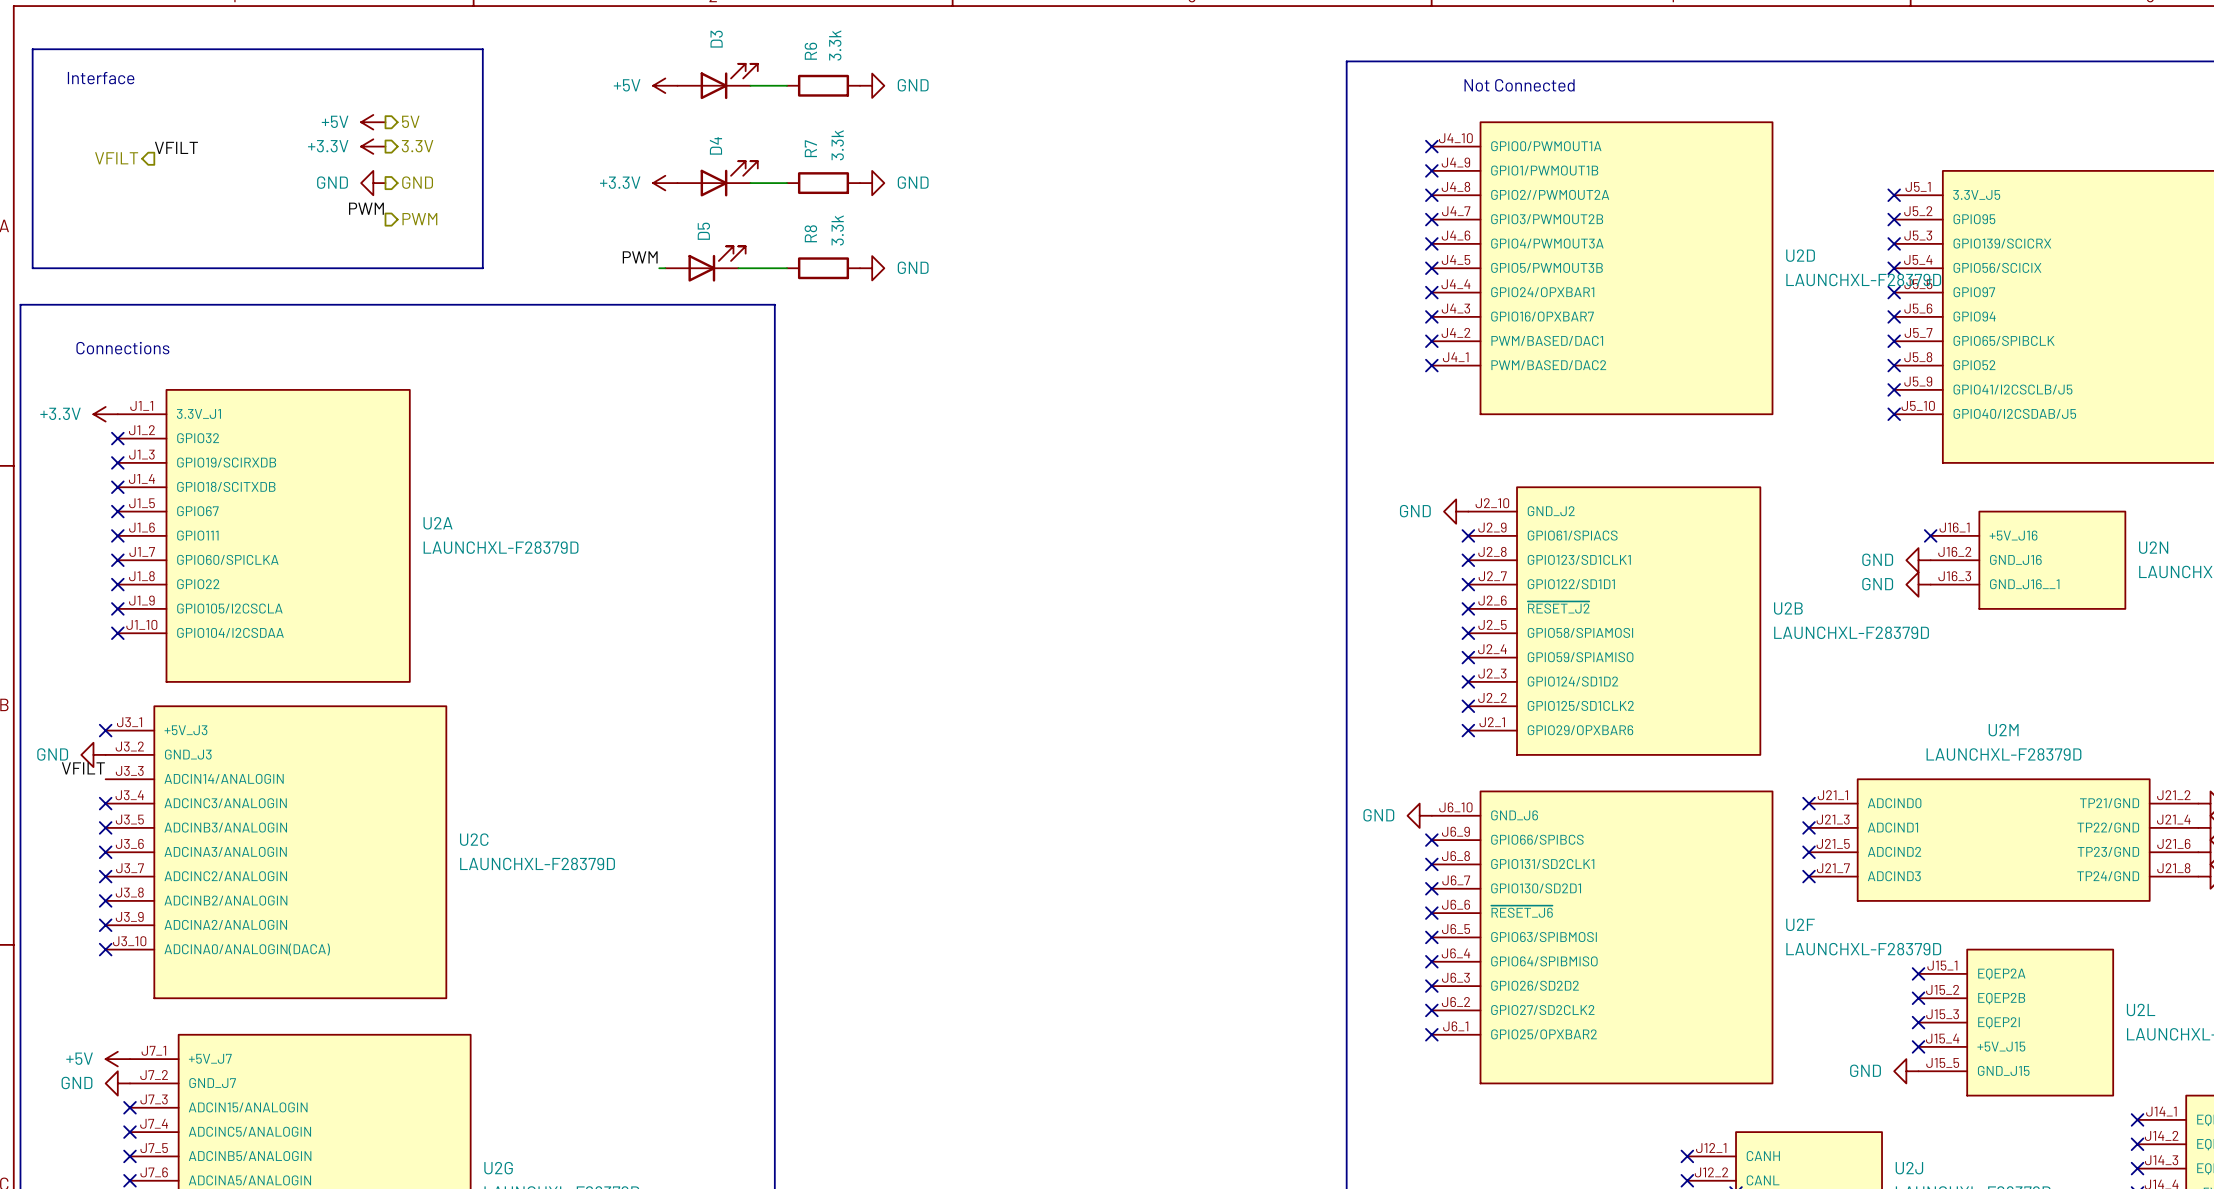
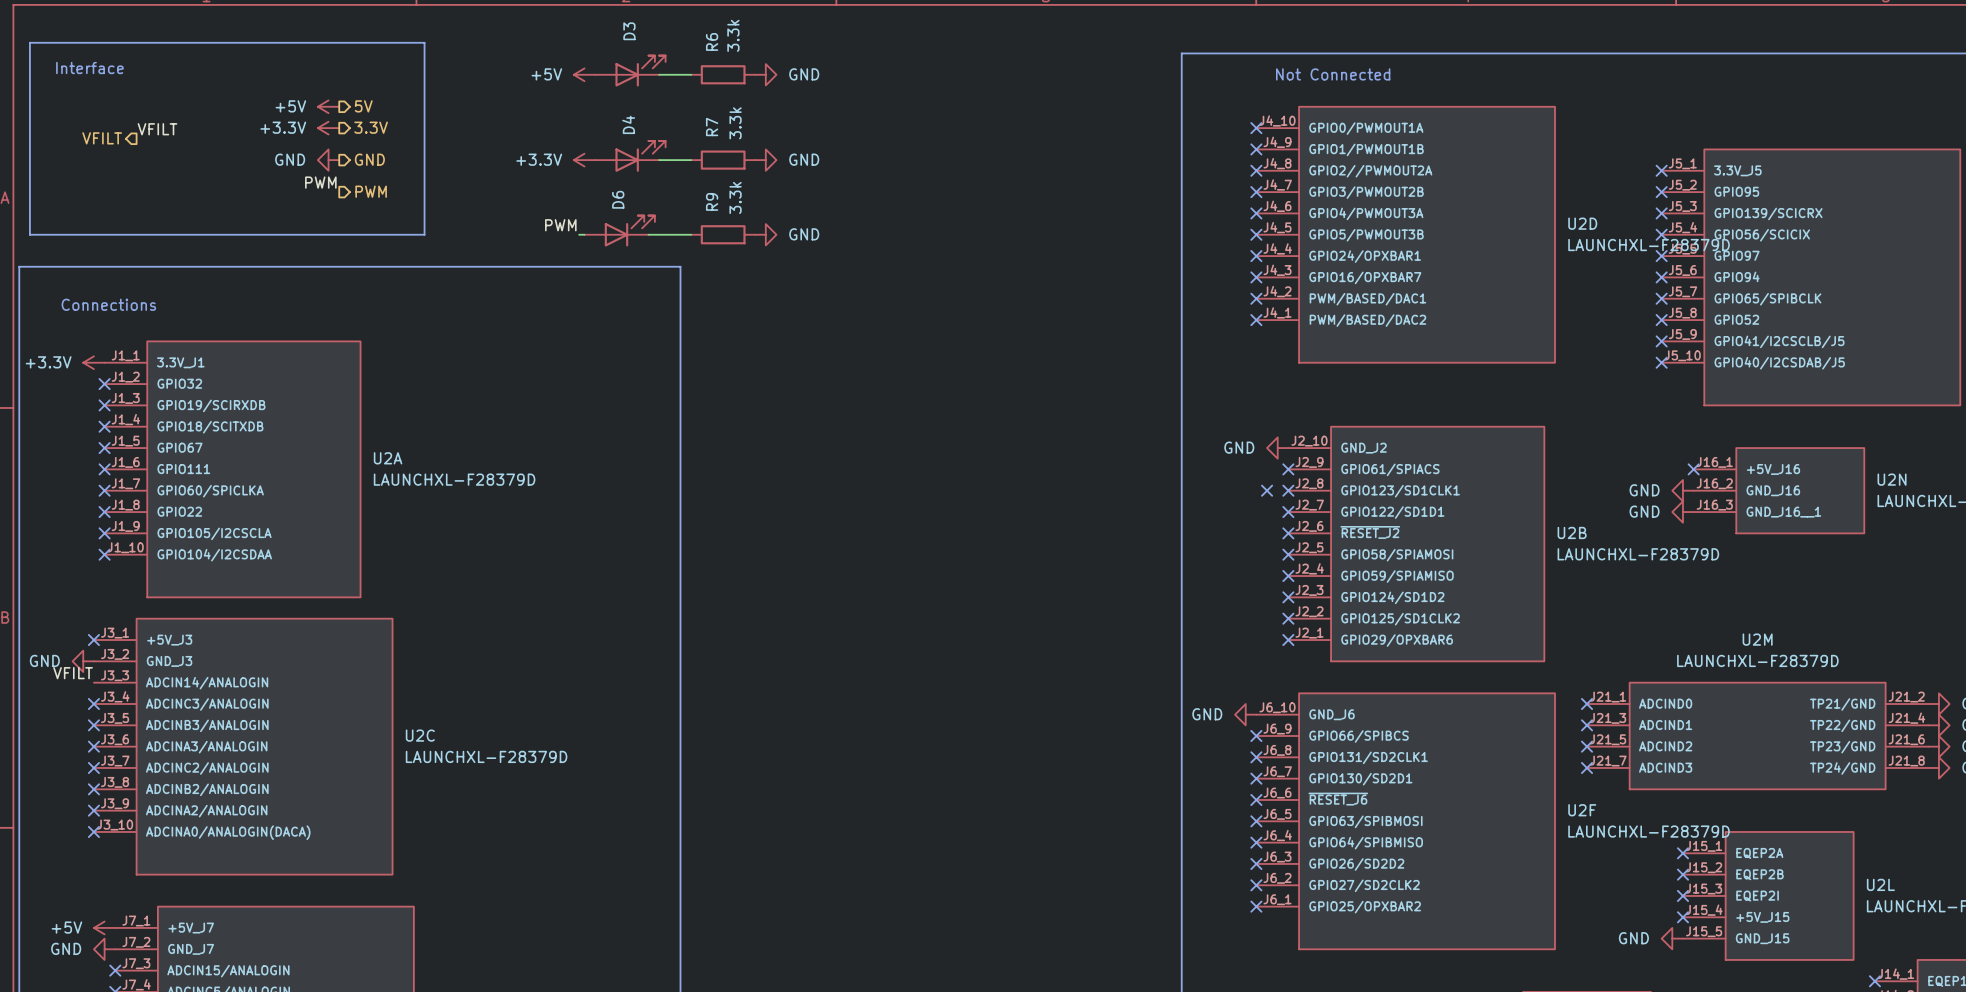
D5 name: D5 (703, 231) -> D6 (618, 199)
R8 name: R8 (810, 233) -> R9 (712, 201)
no-connect mark: none -> (1267, 490)

